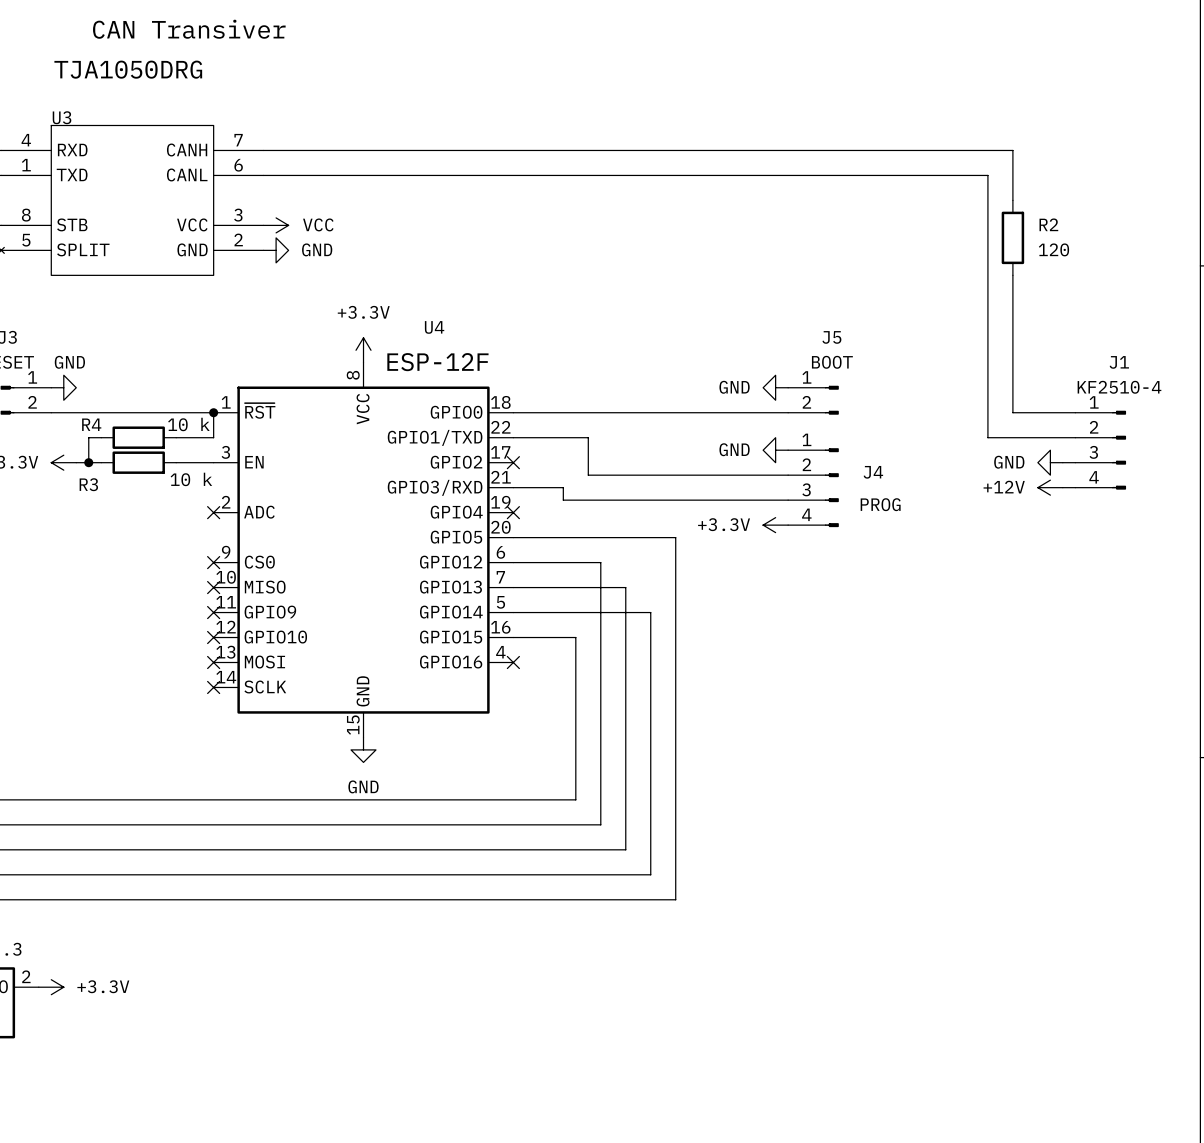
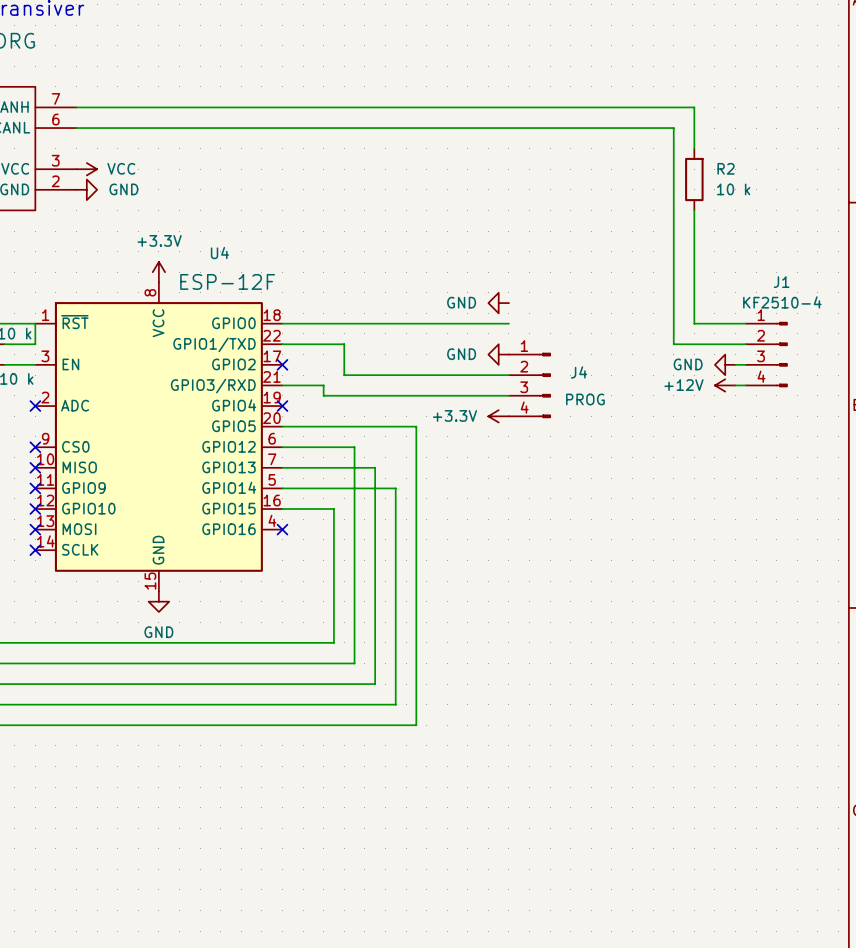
R2 value: 120 (1053, 249) -> 10 k (733, 189)
J5: BOOT (813, 400) -> none
junction: (213, 412) -> none

